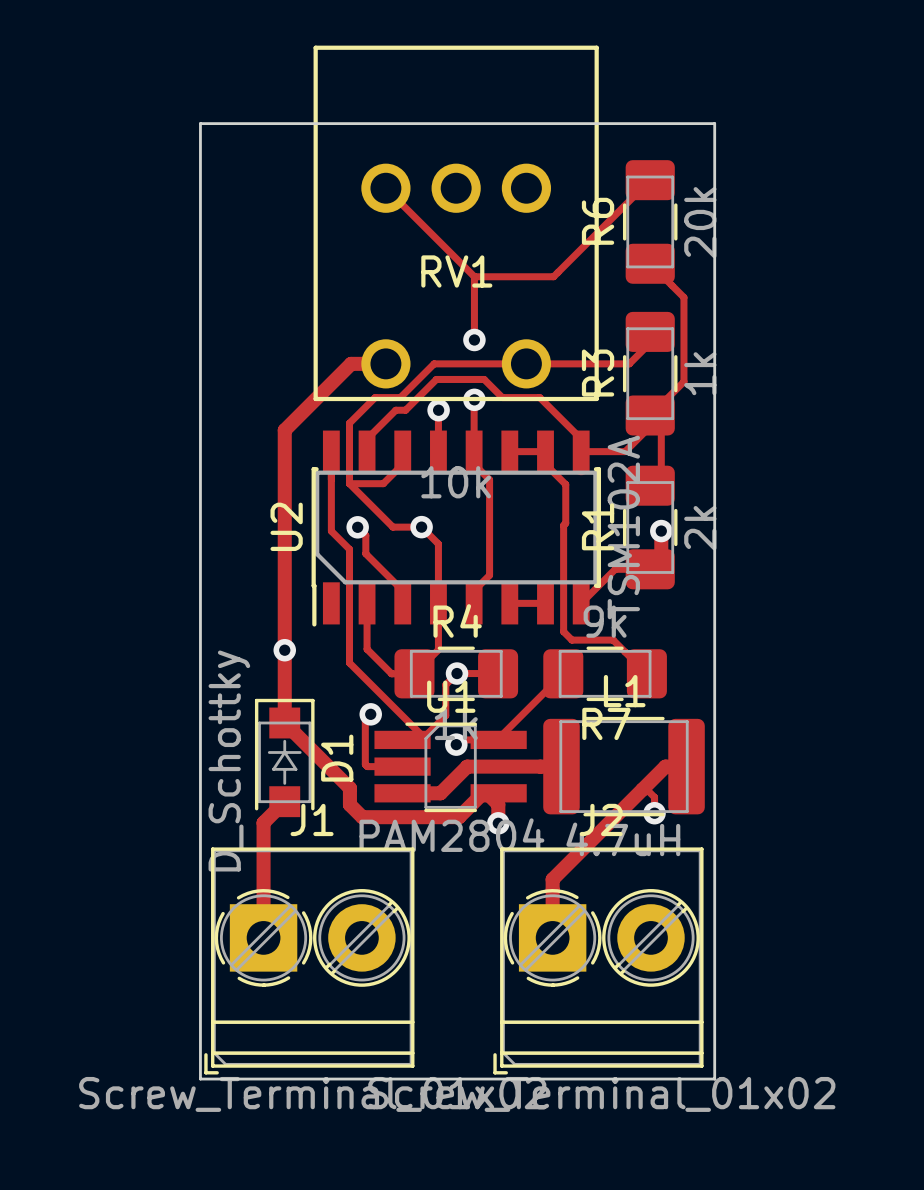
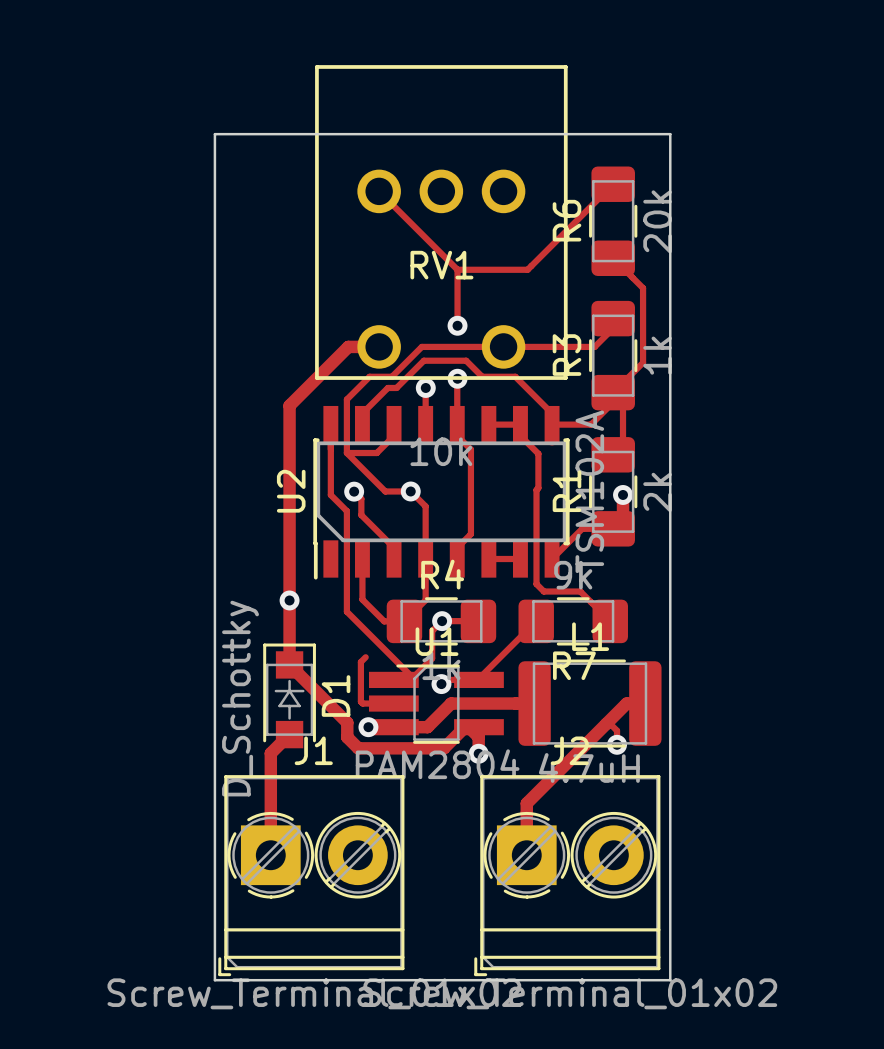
via position: (370, 714) -> (368, 727)

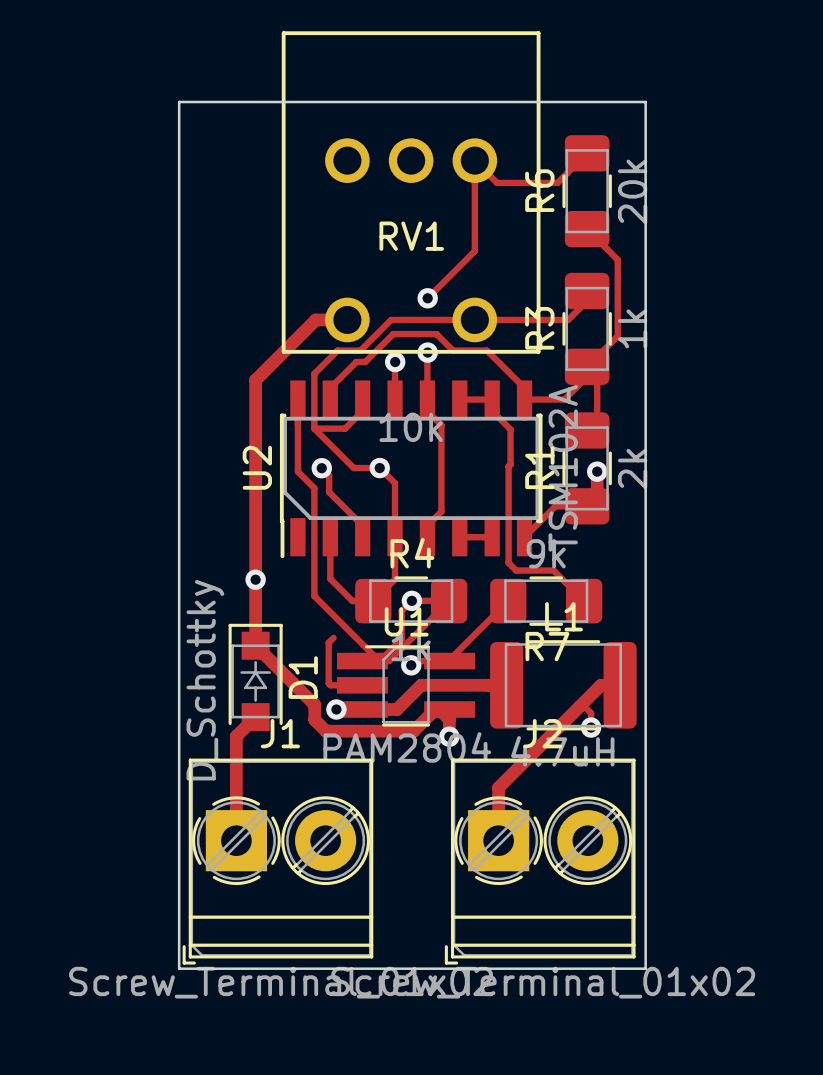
track: (379, 191) (457, 269) -> none
track: (584, 213) (527, 269) (457, 269) -> (557, 182) (497, 182) (474, 160) (474, 251) (427, 298)
track: (457, 269) (457, 325) -> none
track: (346, 611) (415, 679) -> (314, 591) (314, 596) (379, 661) (389, 661) (449, 601)

